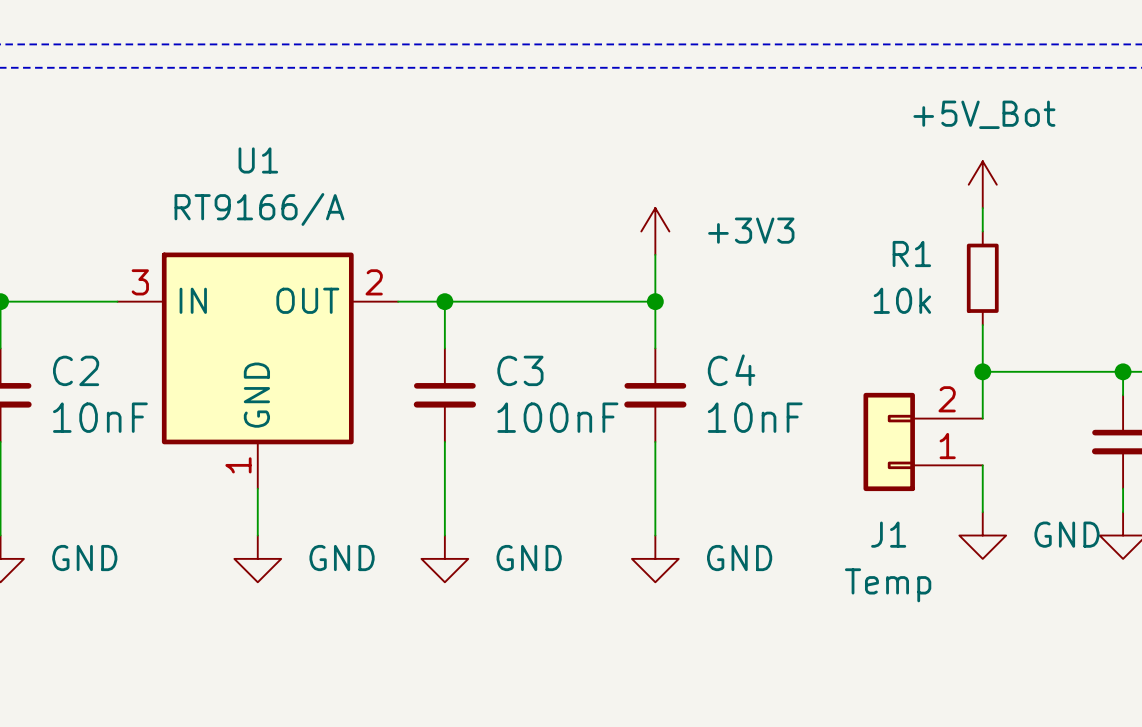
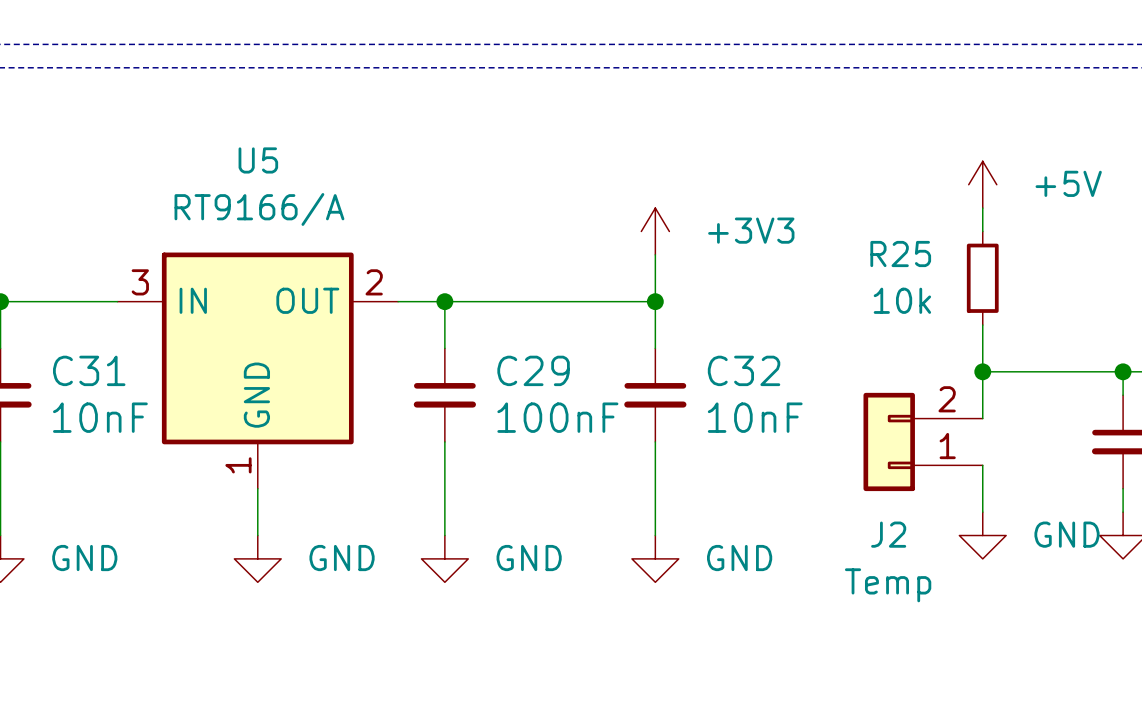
U1 name: U1 (258, 160) -> U5 (258, 160)
power symbol: +5V_Bot (982, 184) -> +5V (982, 184)
R1 name: R1 (911, 254) -> R25 (900, 254)
C2 name: C2 (76, 370) -> C31 (89, 370)
C3 name: C3 (520, 370) -> C29 (533, 370)
C4 name: C4 (731, 370) -> C32 (744, 370)
J1 name: J1 (888, 534) -> J2 (888, 534)

